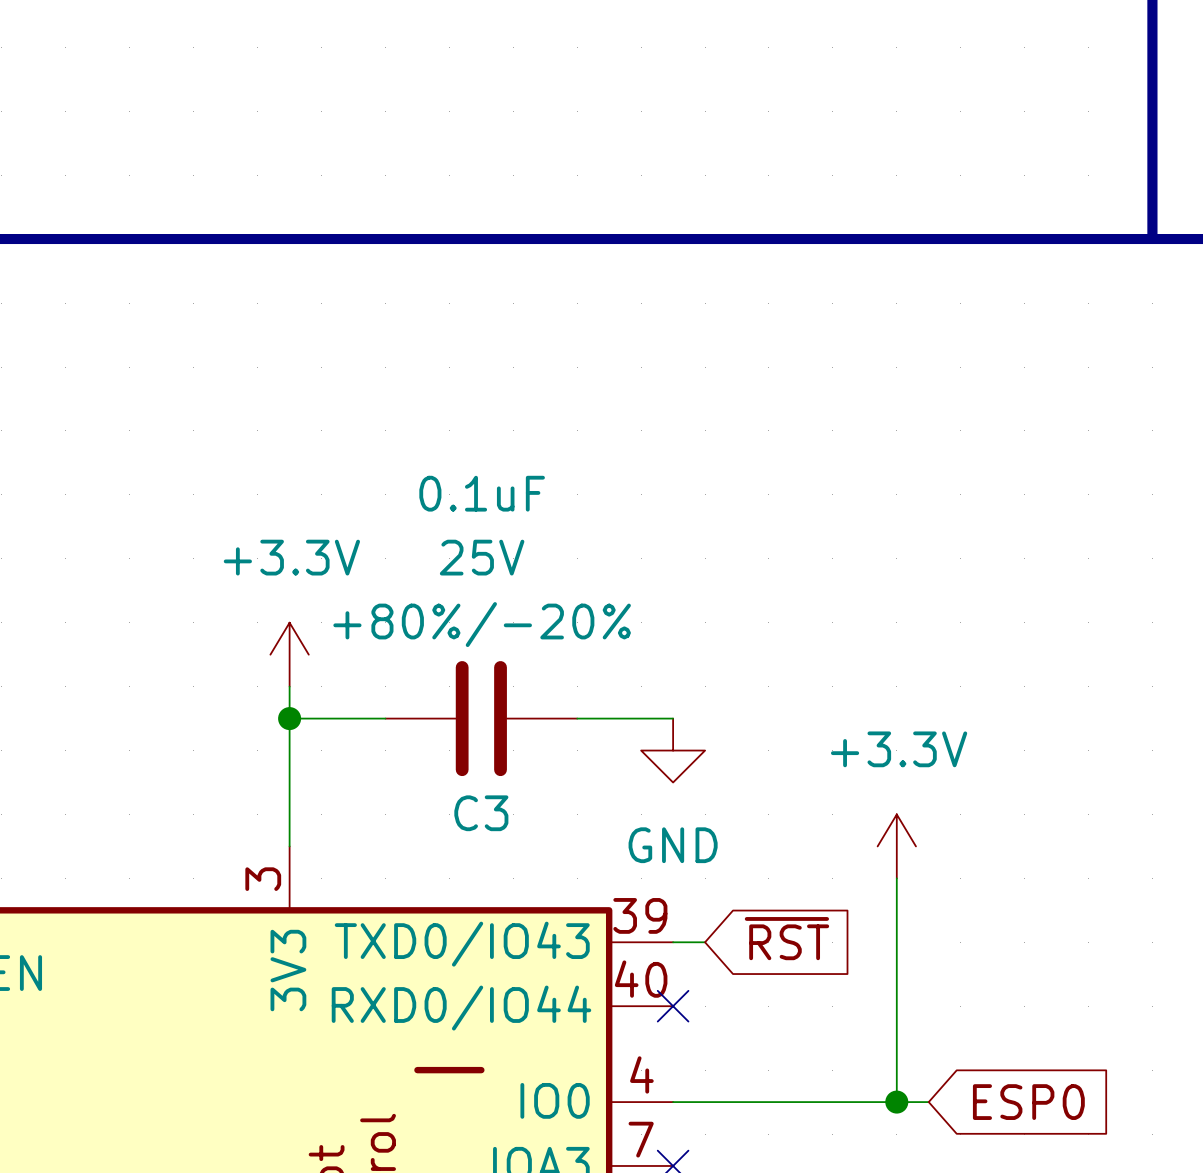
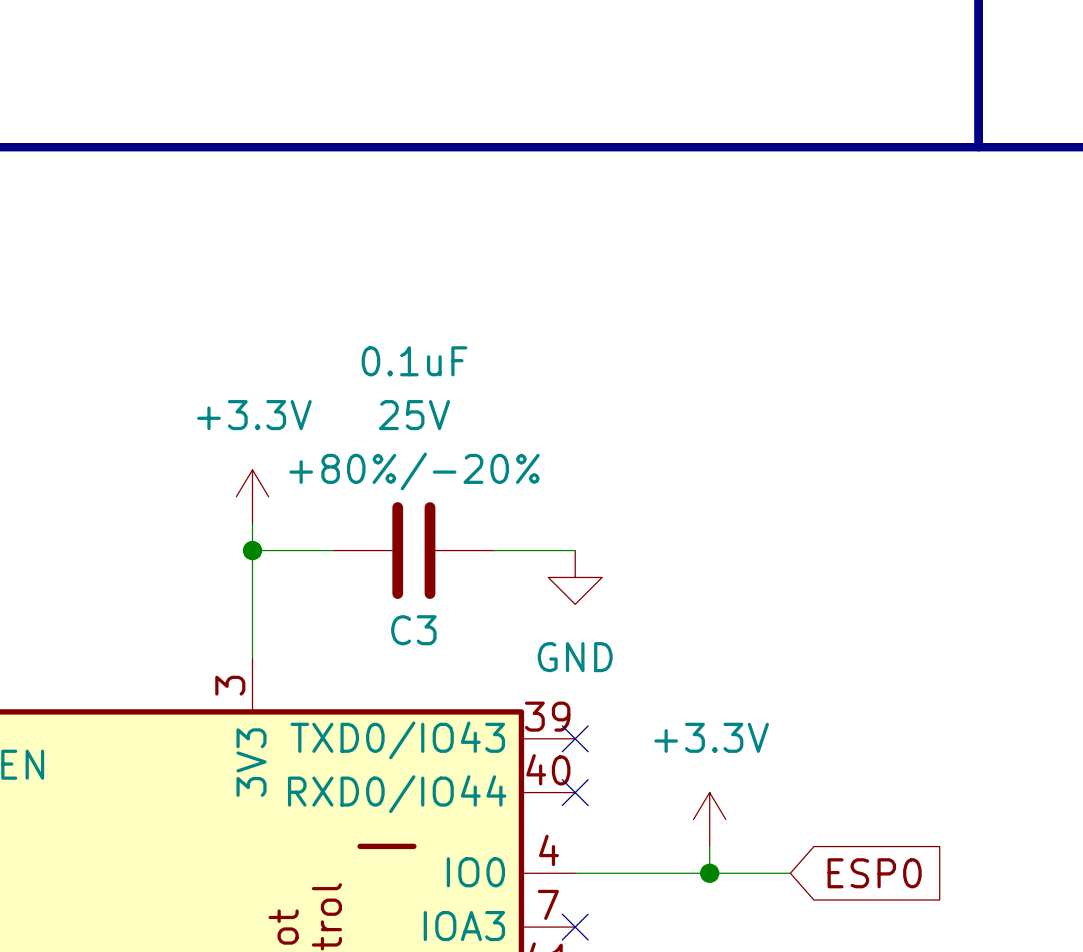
power symbol position: +3.3V (896, 846) -> +3.3V (709, 819)
wire: (896, 878) (896, 1102) -> none
global label: ~{RST} (786, 938) -> none
wire: (673, 942) (705, 942) -> none
no-connect mark: none -> (575, 738)
wire: none -> (709, 846) (709, 873)
junction position: (896, 1102) -> (709, 873)

